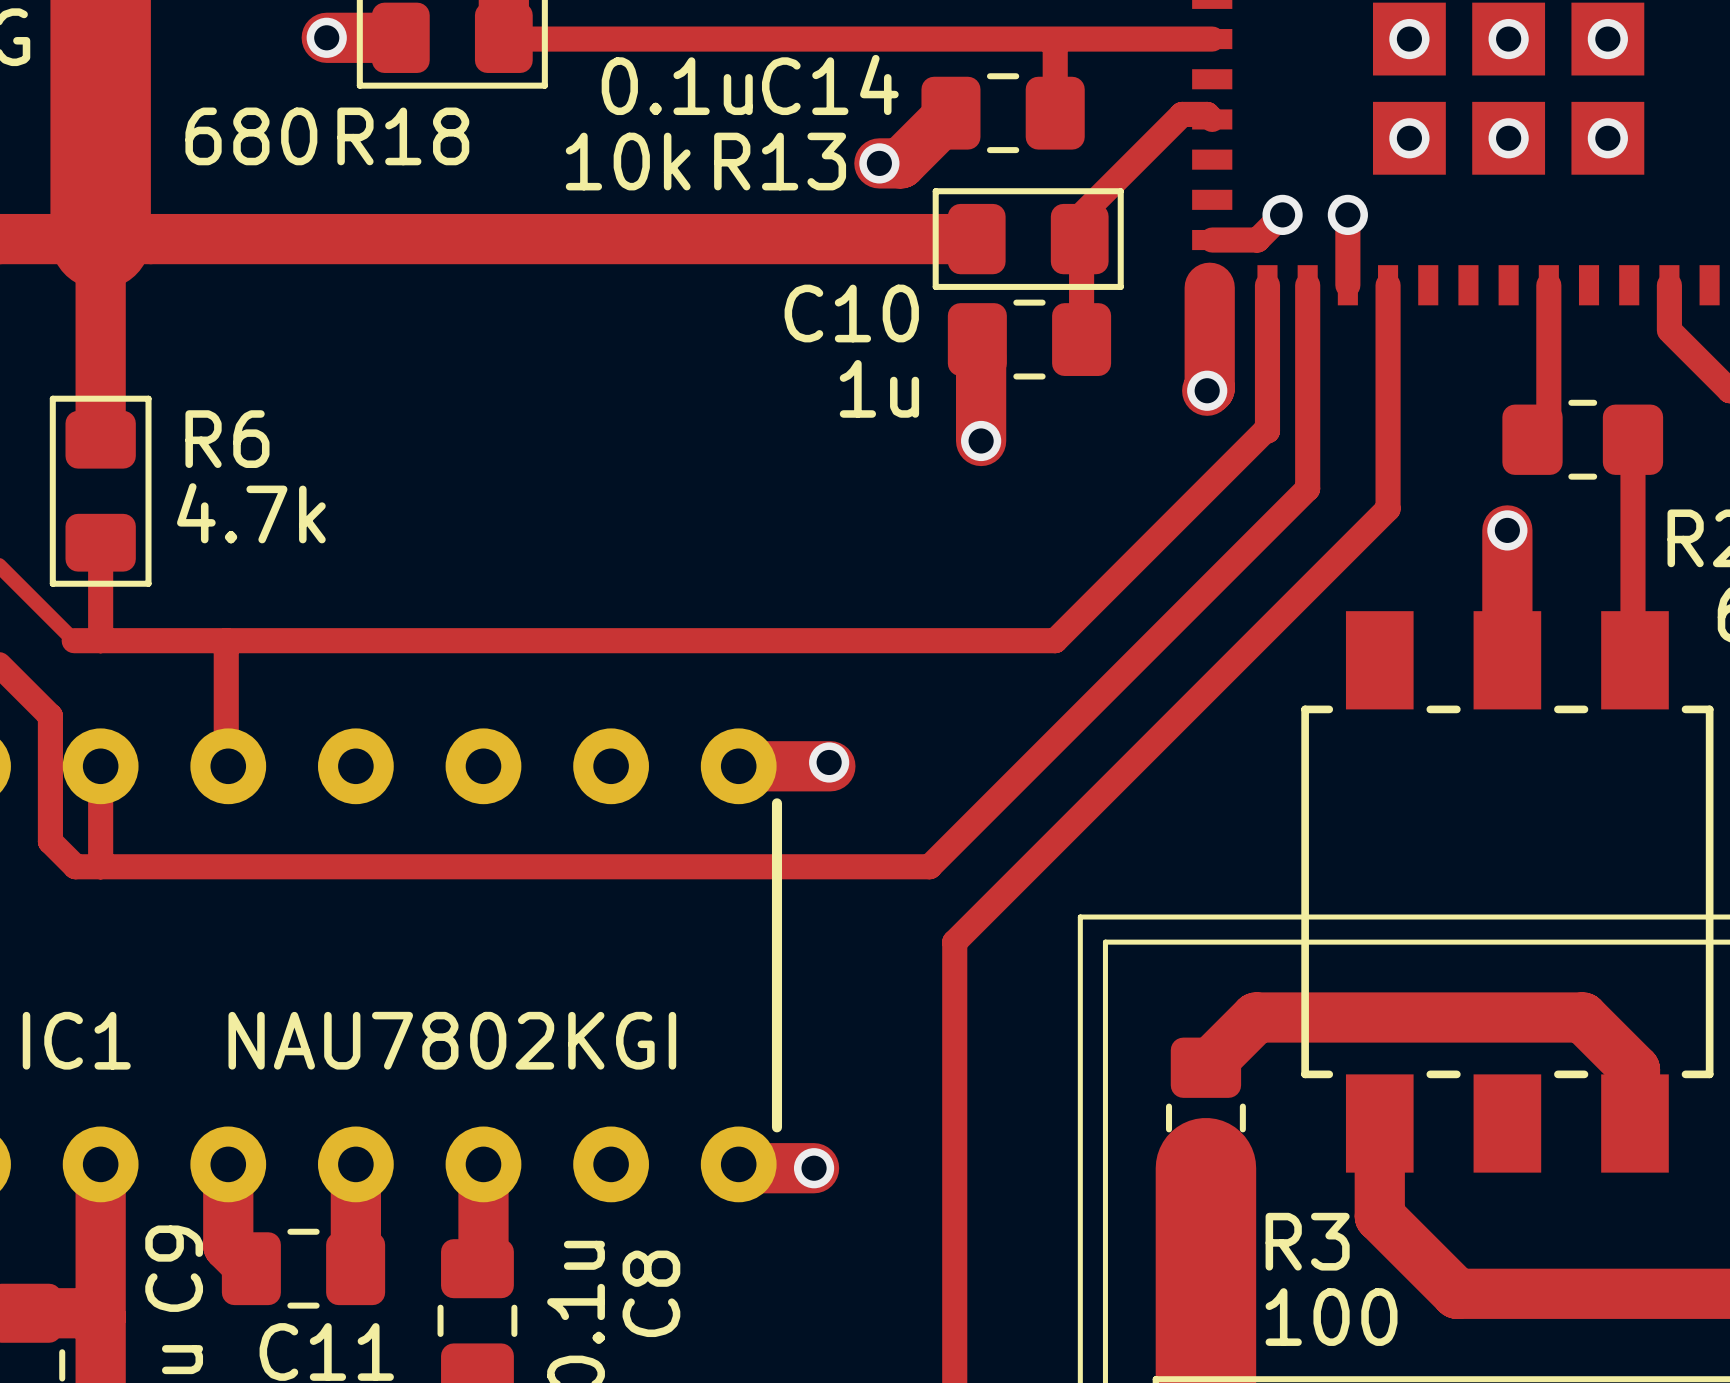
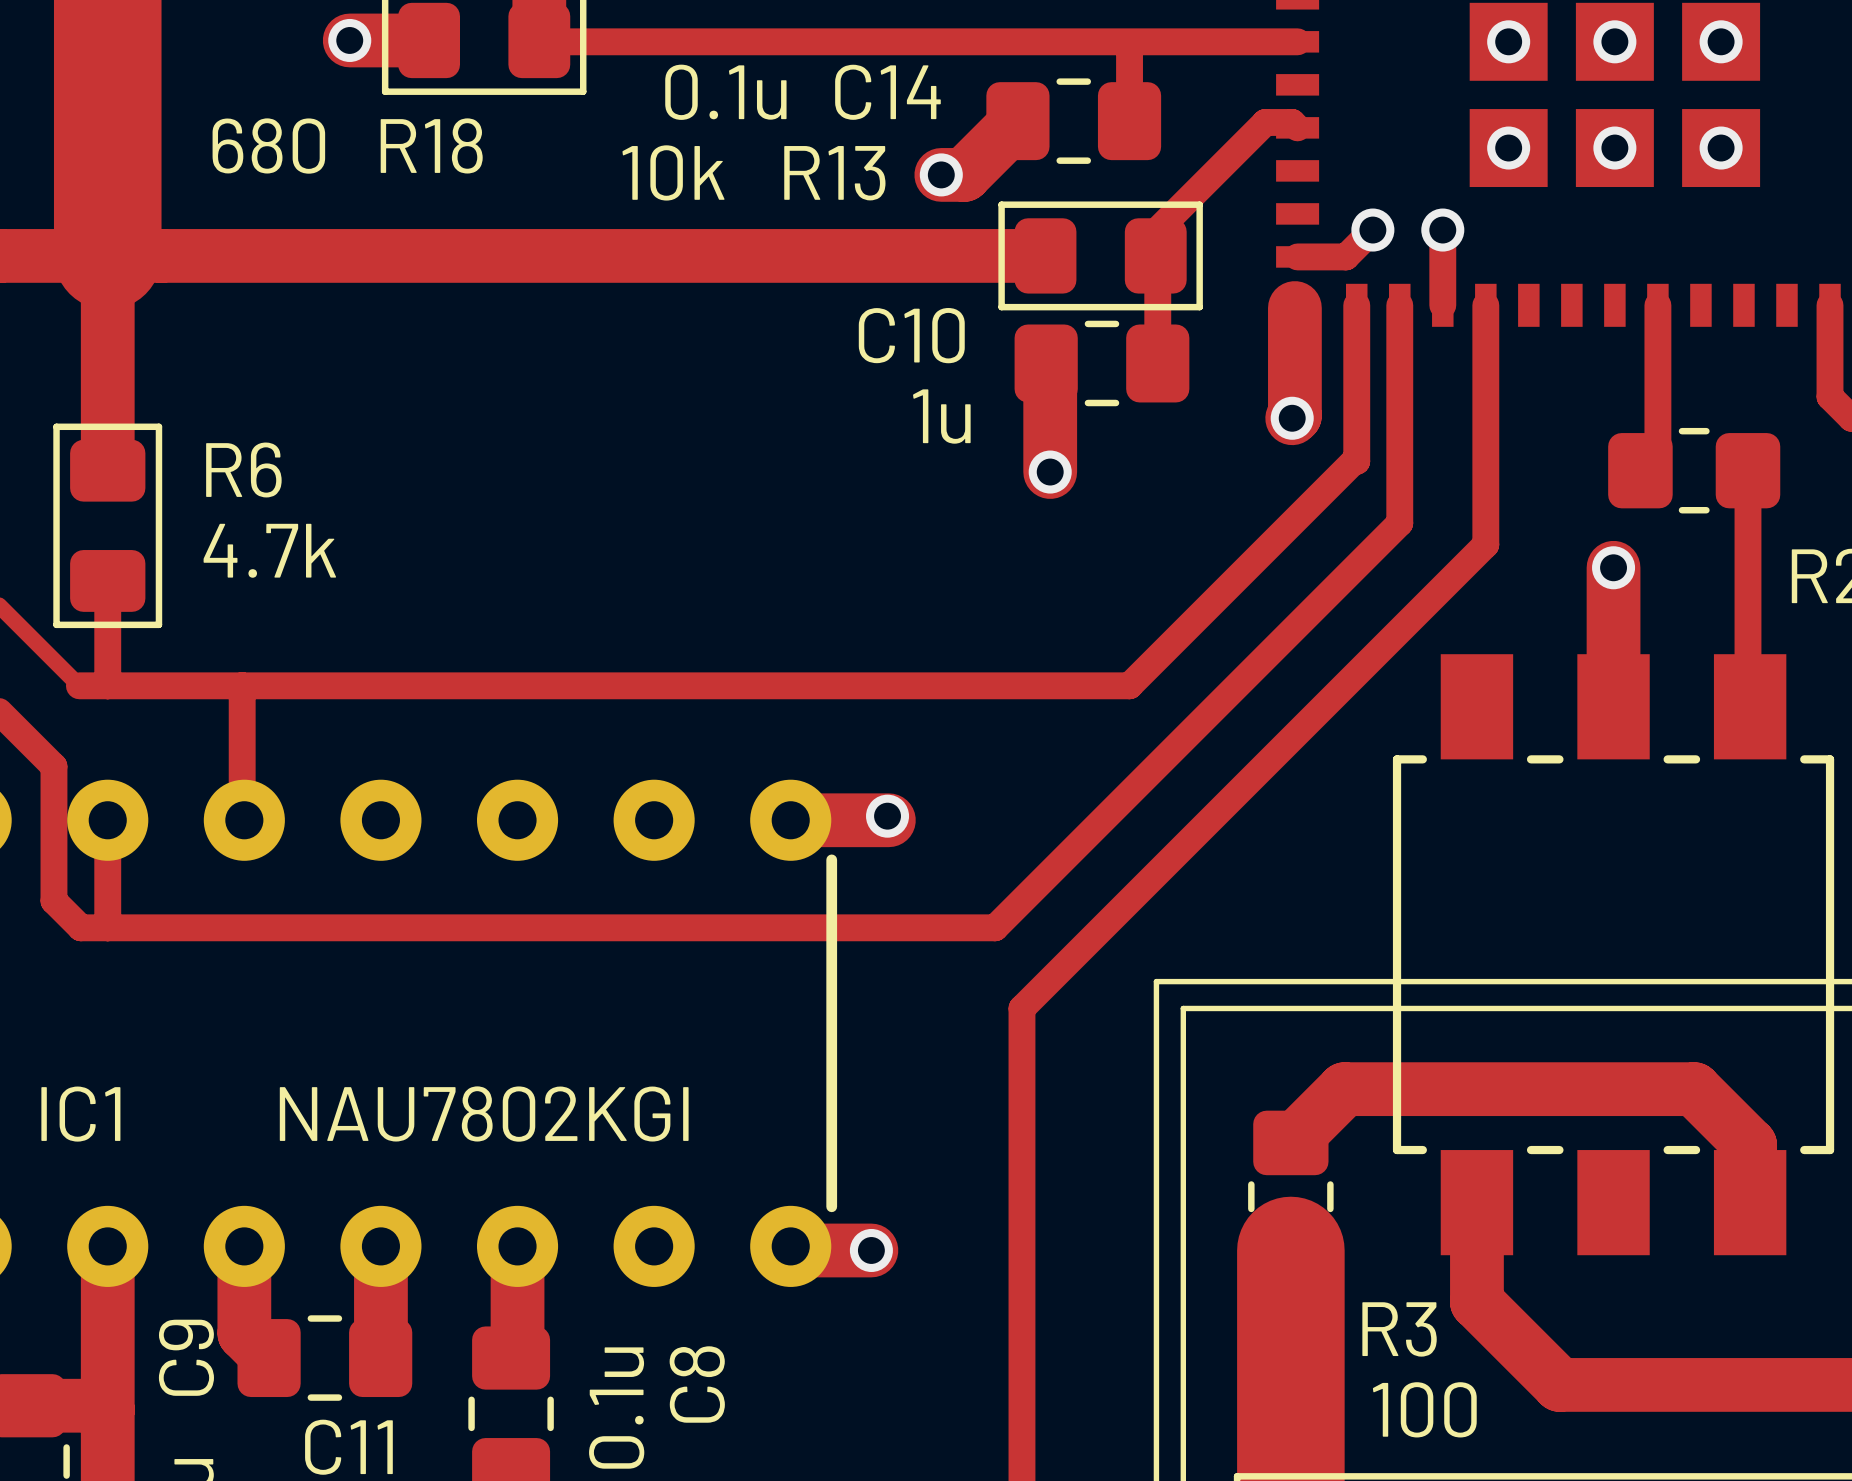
track: (1669, 285) (1669, 330) (1709, 370) -> (1830, 305) (1830, 396)

